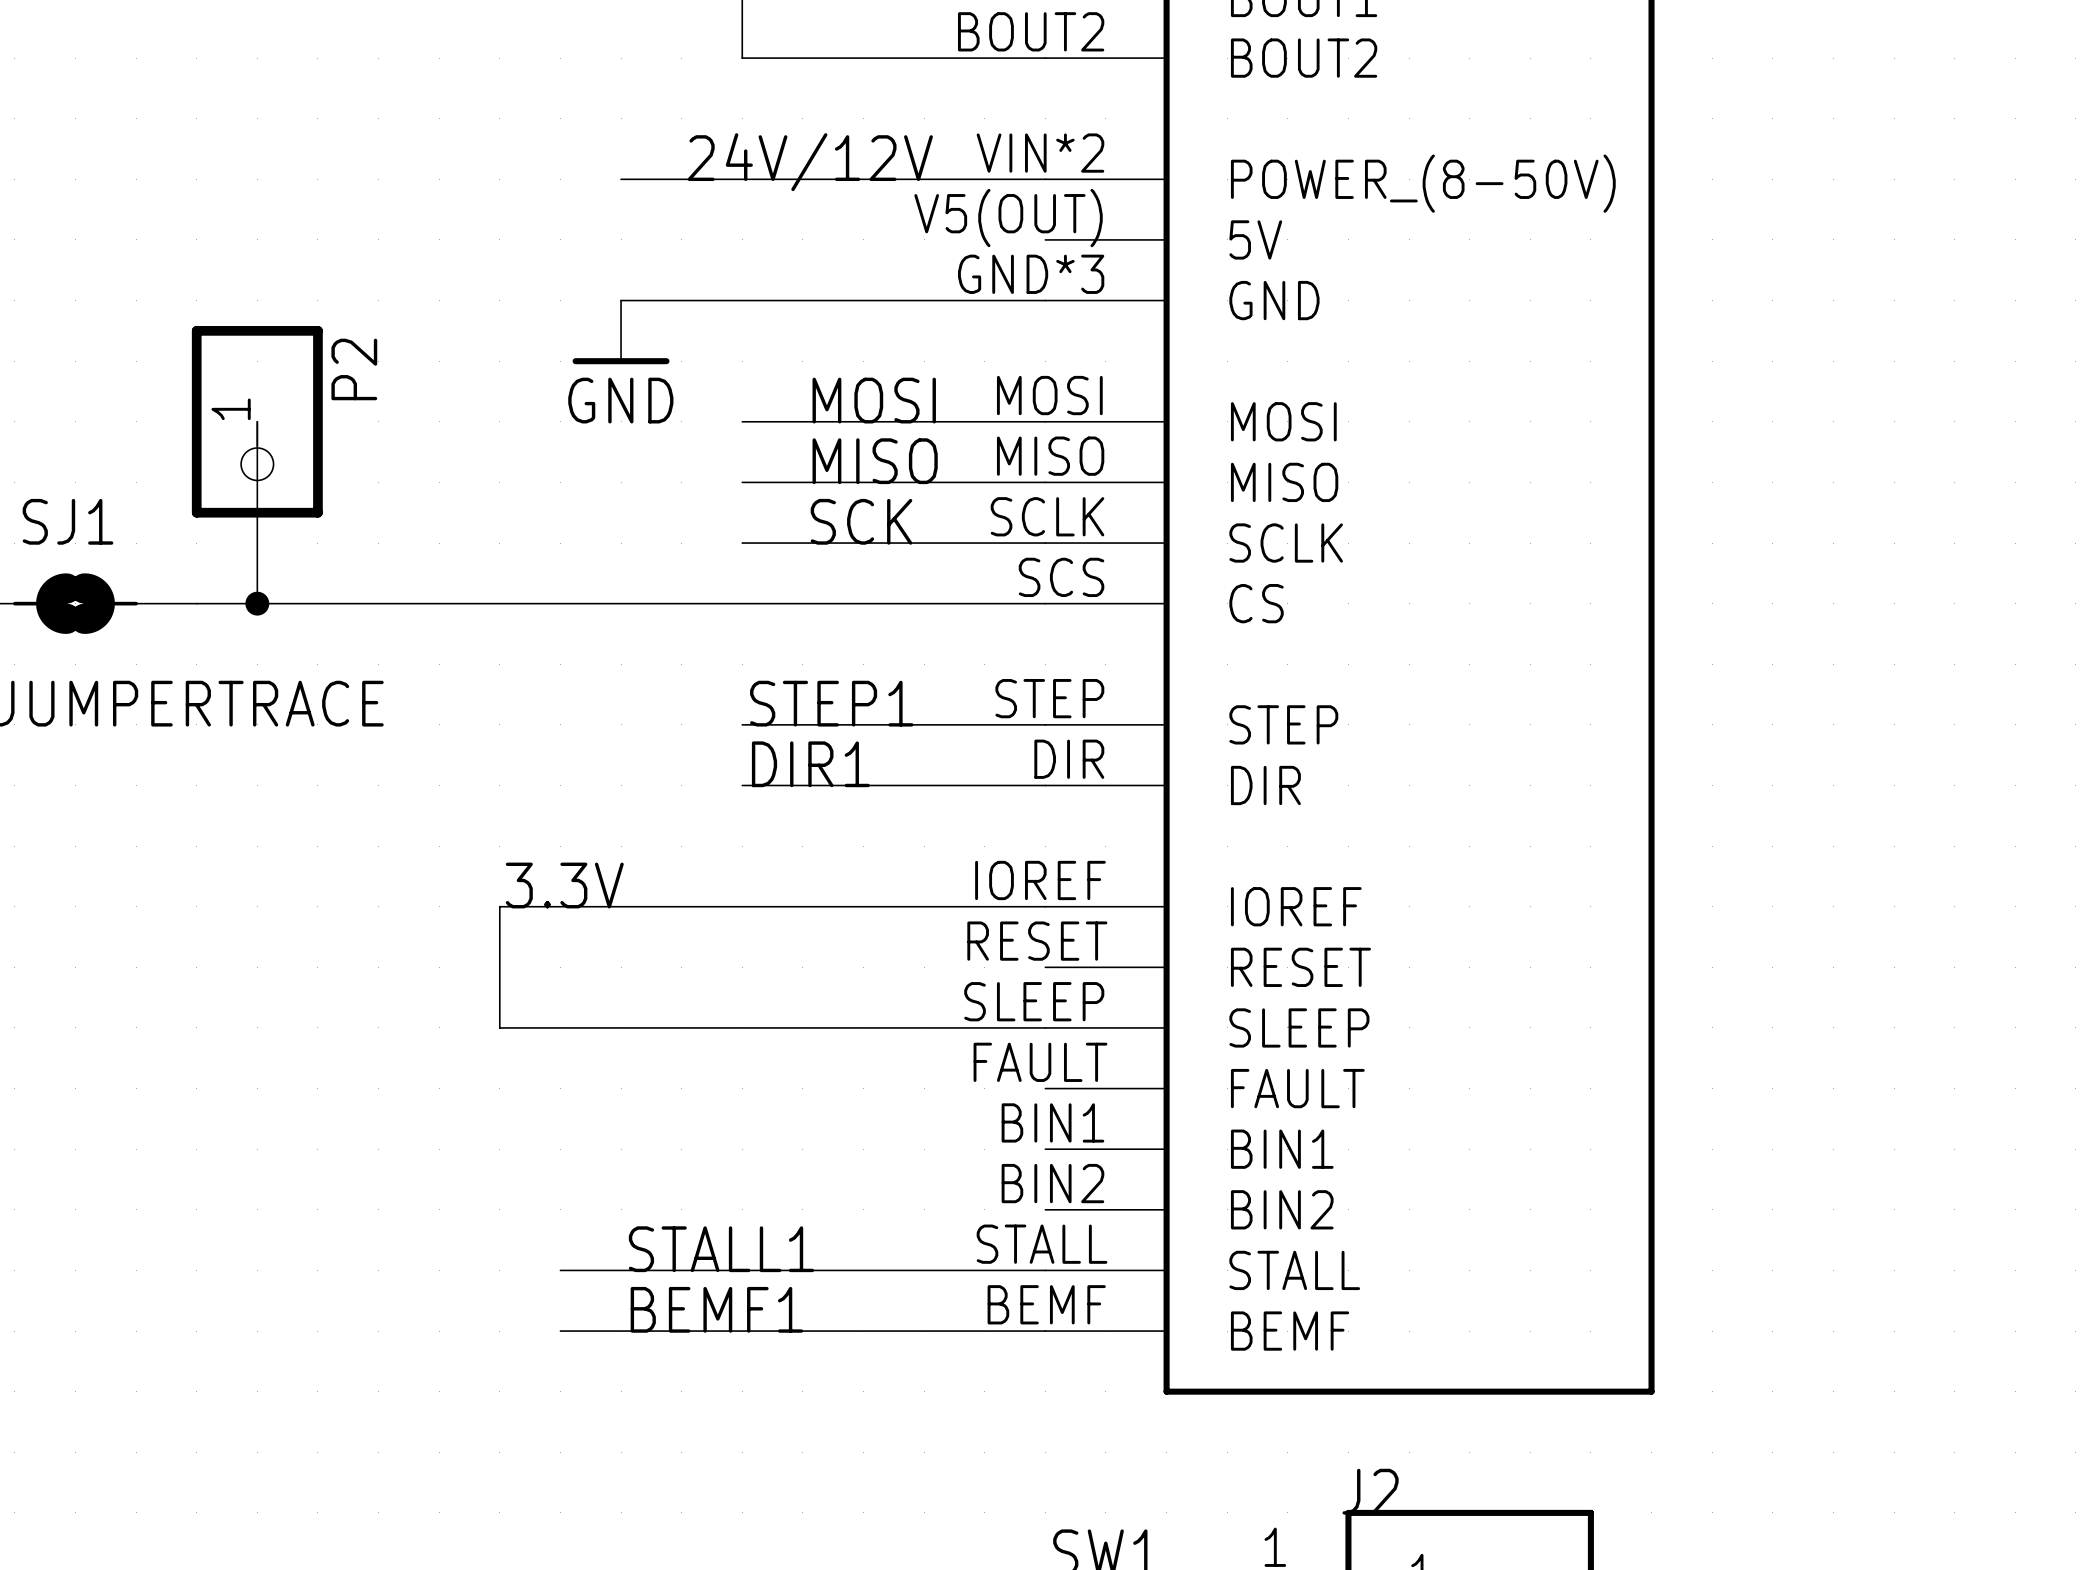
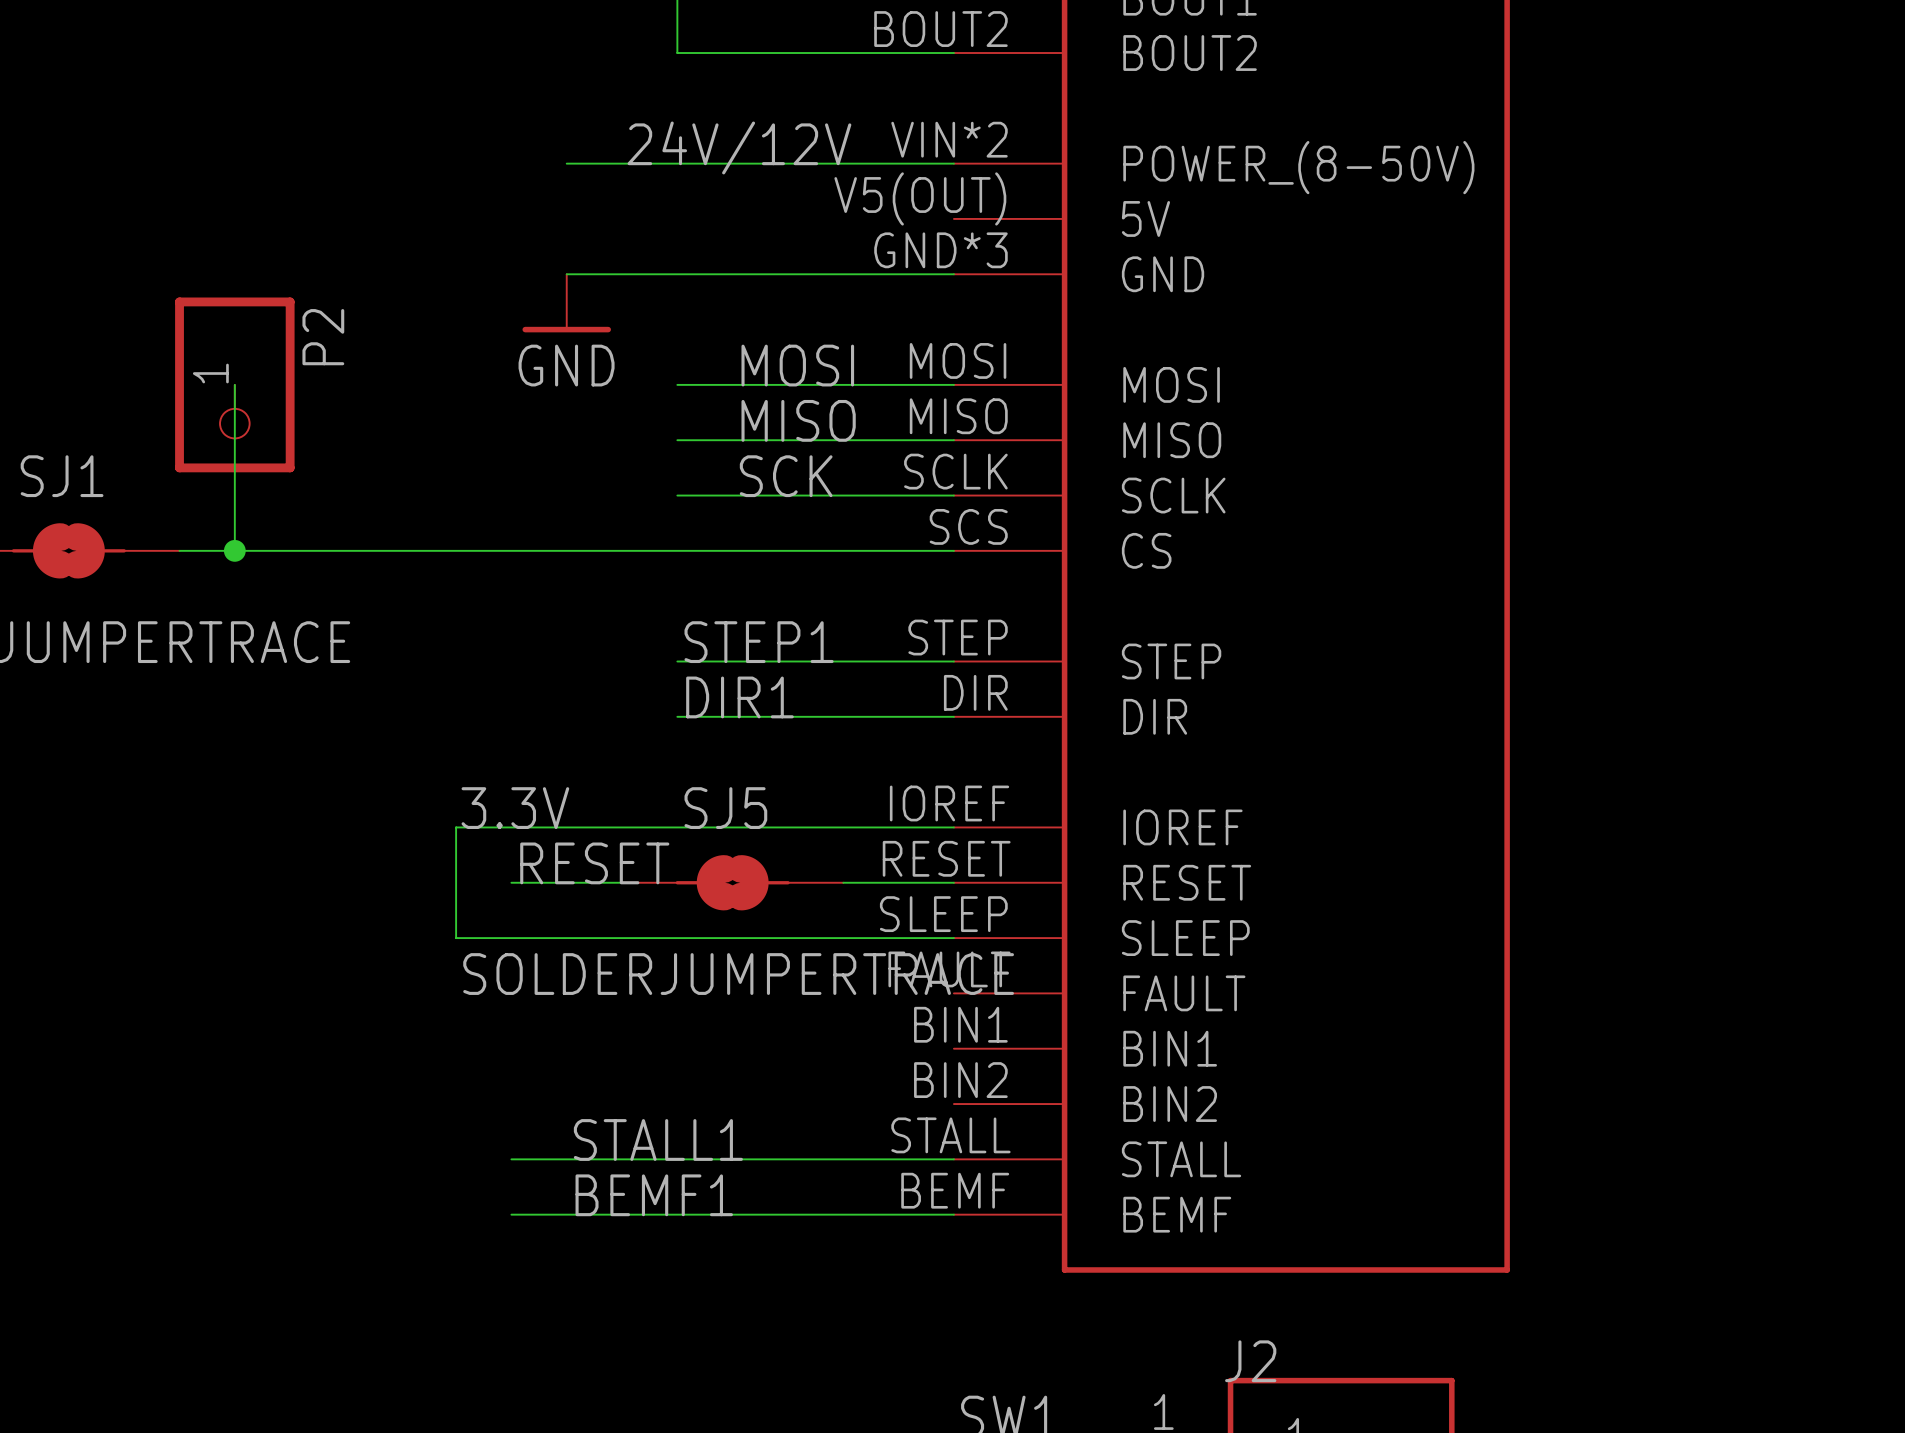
label: none -> RESET (594, 863)
wire: none -> (511, 882) (622, 882)
SJ5: none -> SOLDERJUMPERTRACE (732, 882)
wire: none -> (843, 882) (953, 882)

